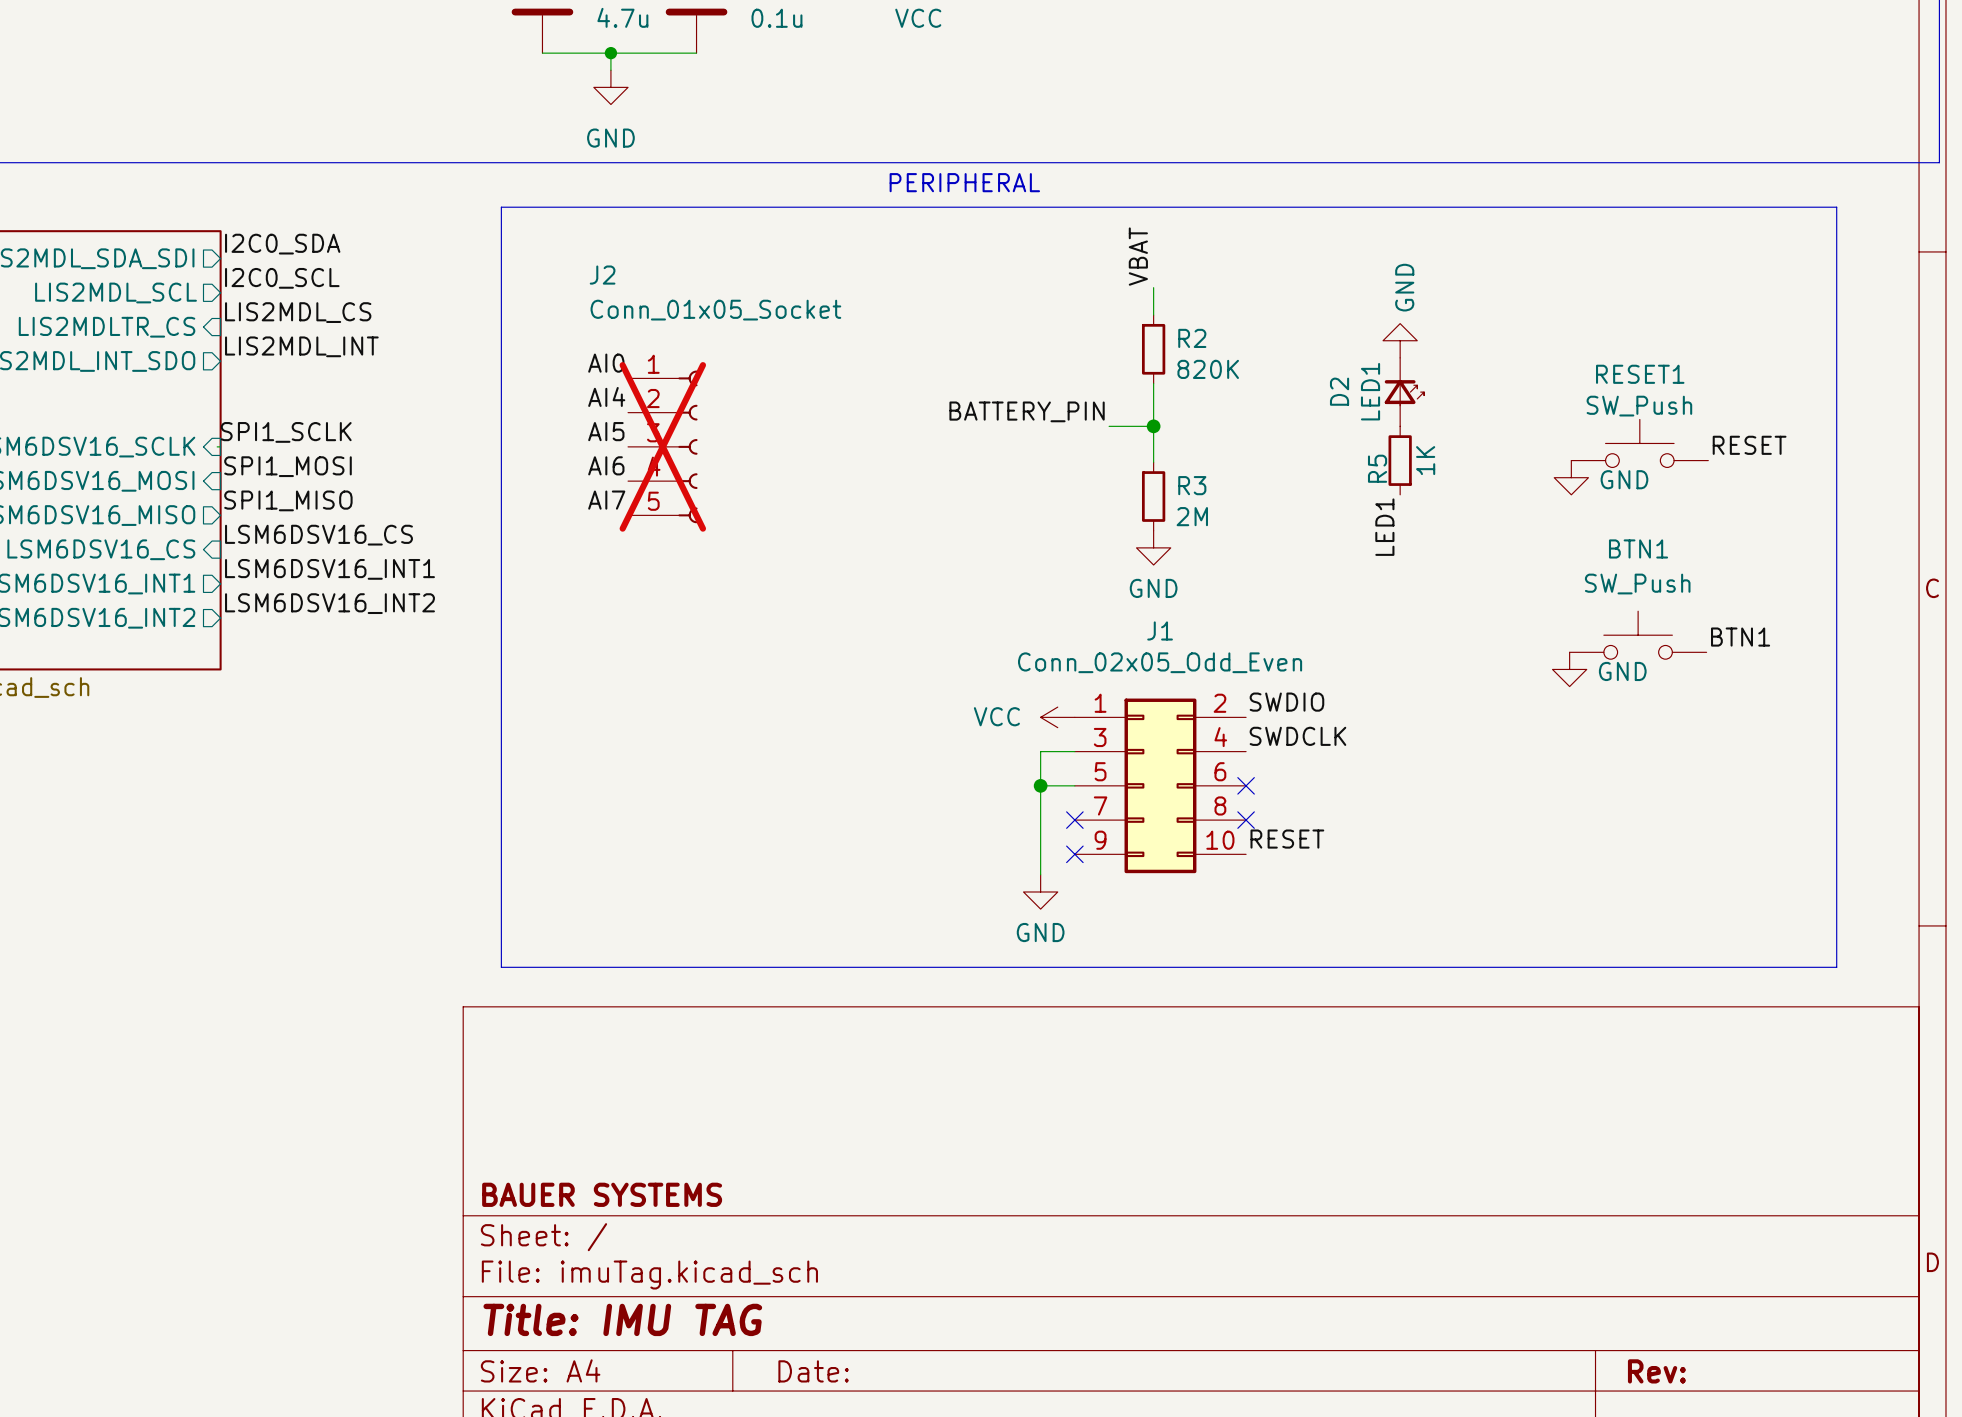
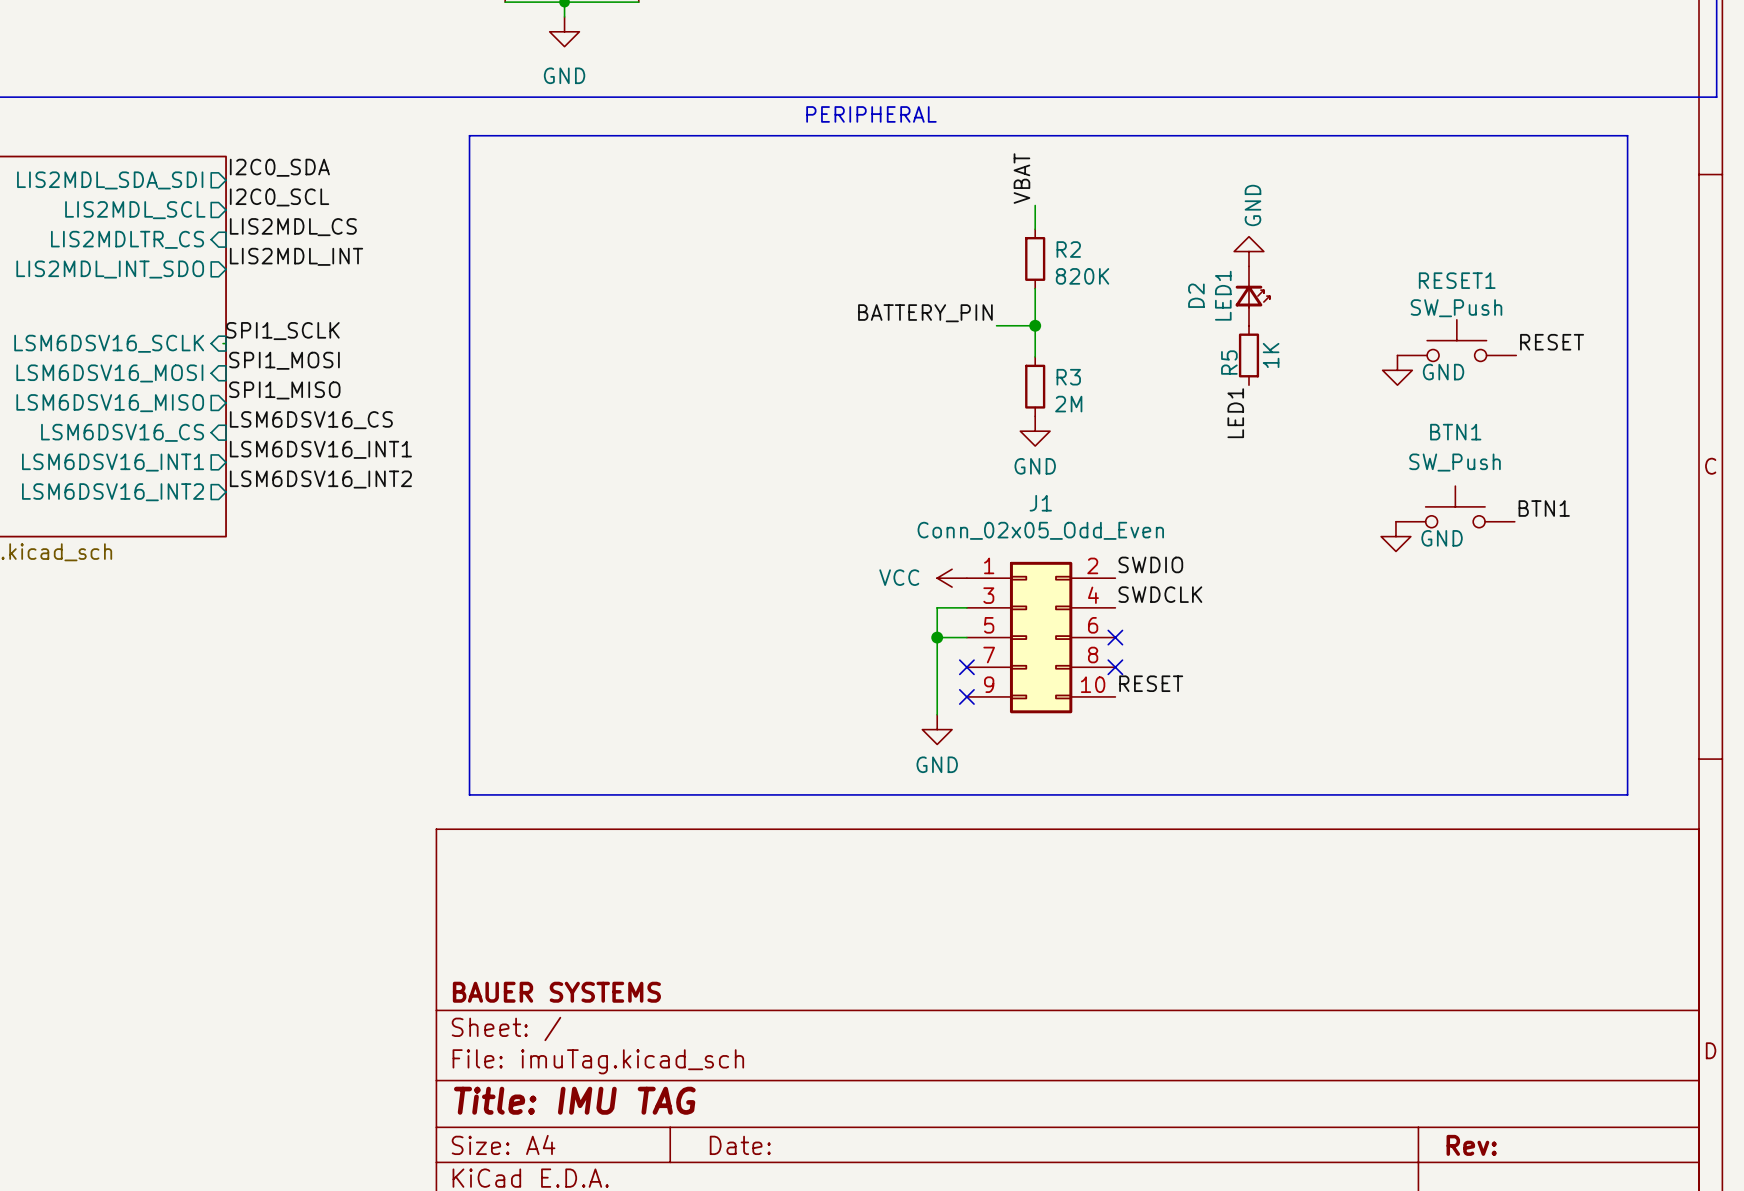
label: AI0 (606, 363) -> none
label: AI4 (606, 396) -> none
label: AI5 (606, 431) -> none
J2: Conn_01x05_Socket (662, 446) -> none
label: AI6 (606, 465) -> none
label: AI7 (606, 500) -> none

